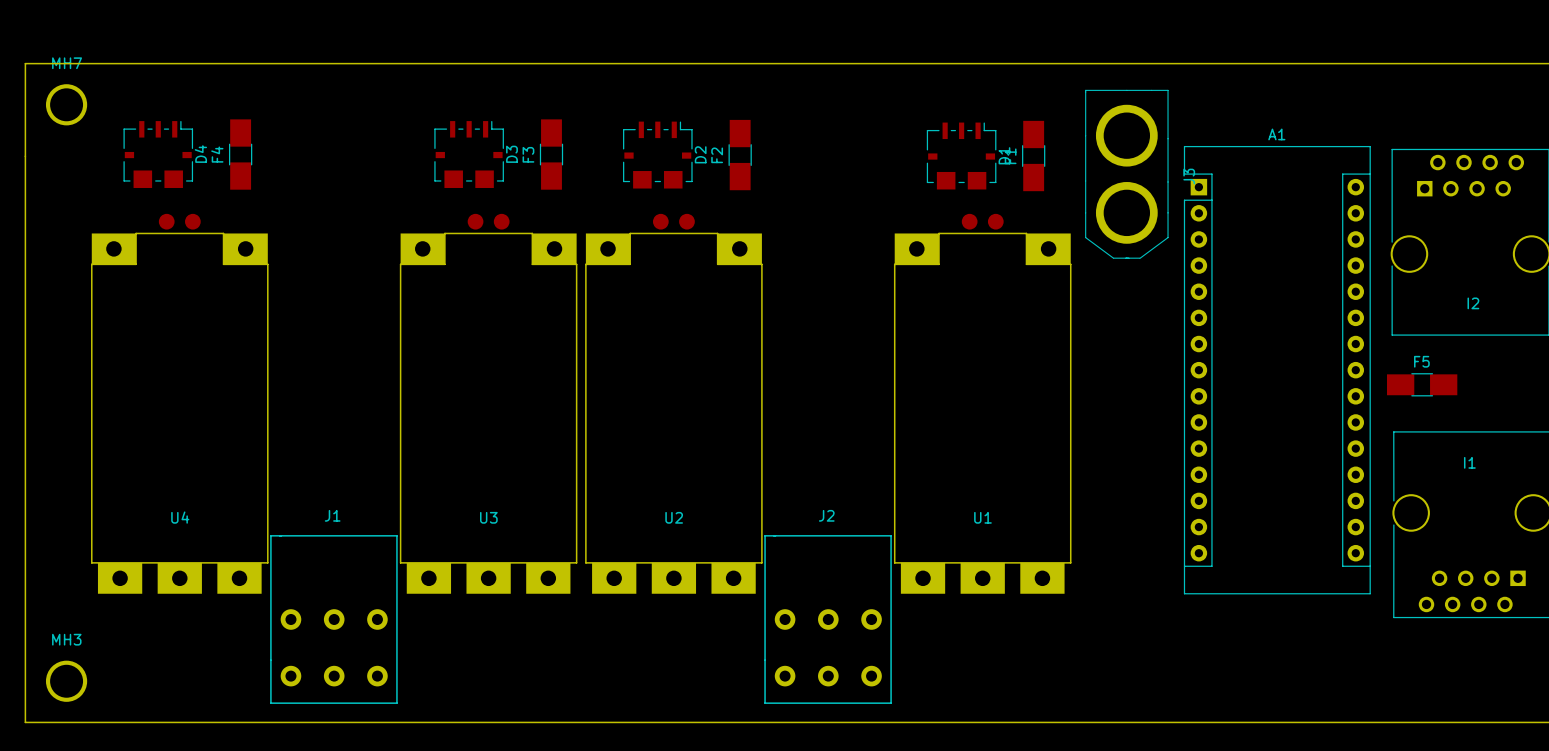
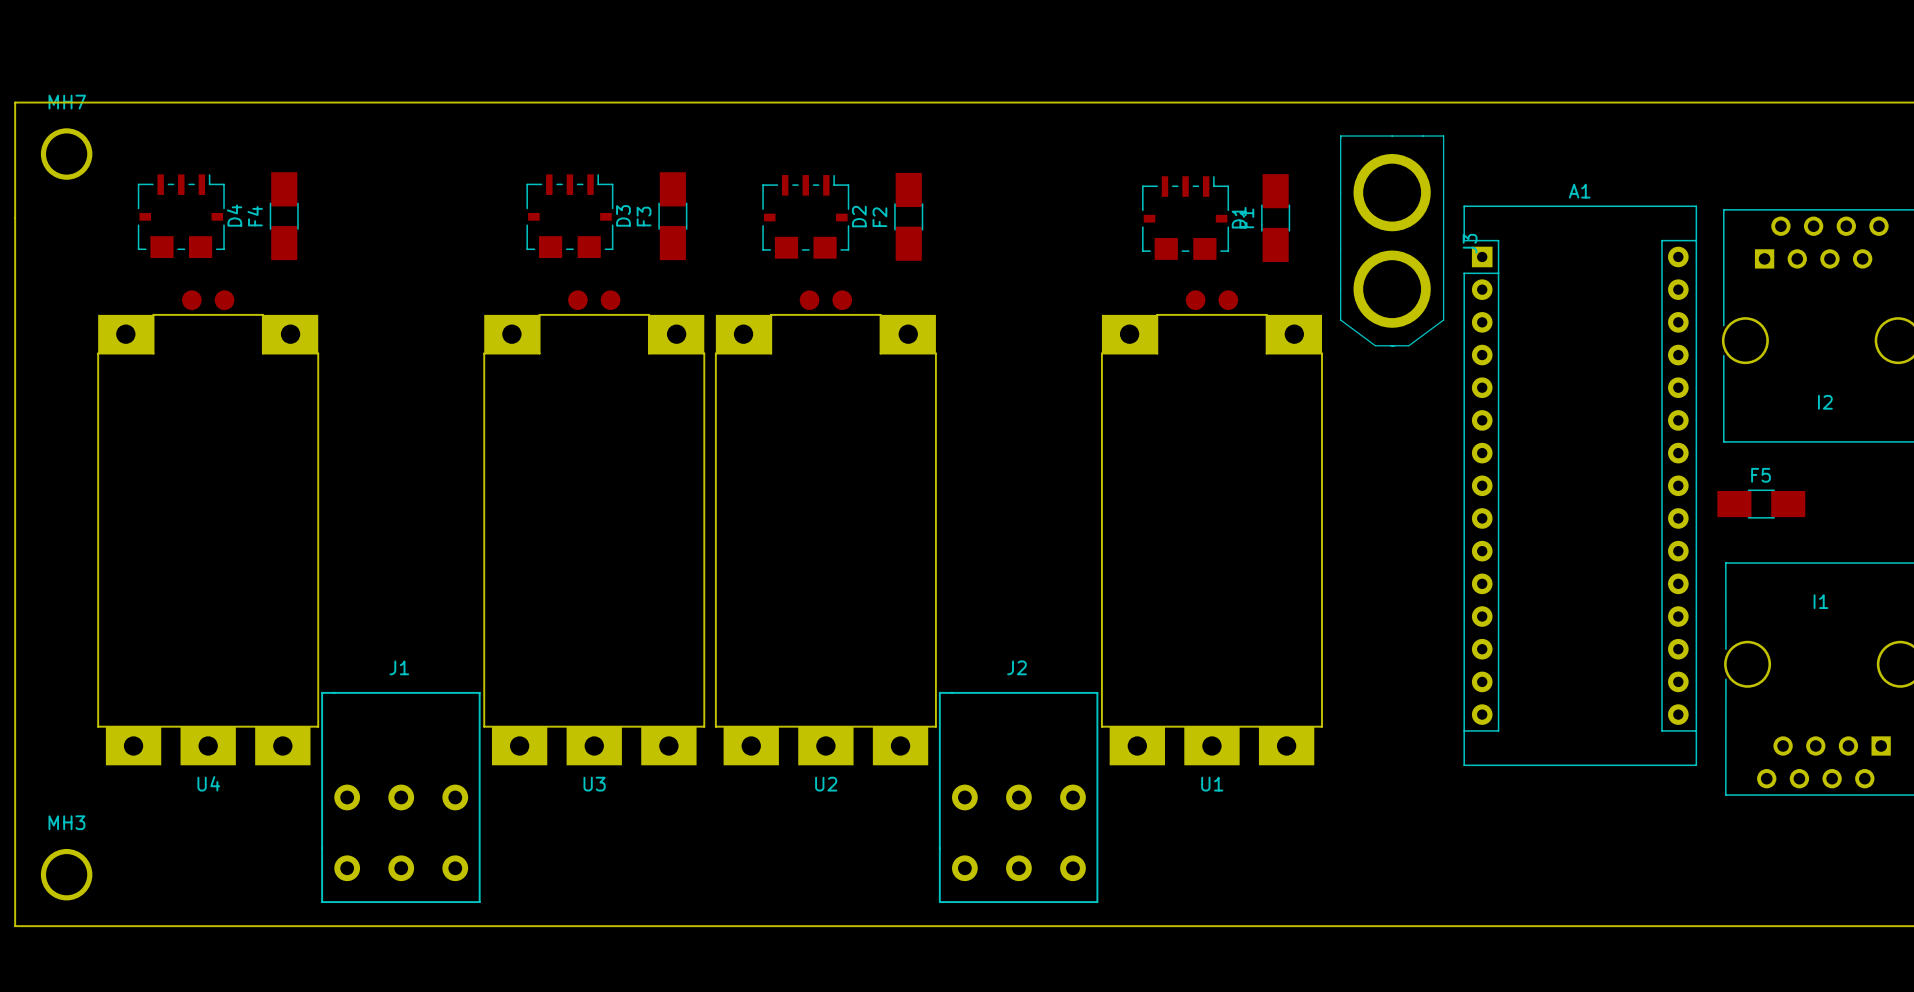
U4 name position: U4 (180, 517) -> U4 (208, 783)
U3 name position: U3 (488, 517) -> U3 (594, 784)
U2 name position: U2 (674, 517) -> U2 (826, 784)
U1 name position: U1 (982, 517) -> U1 (1212, 784)

